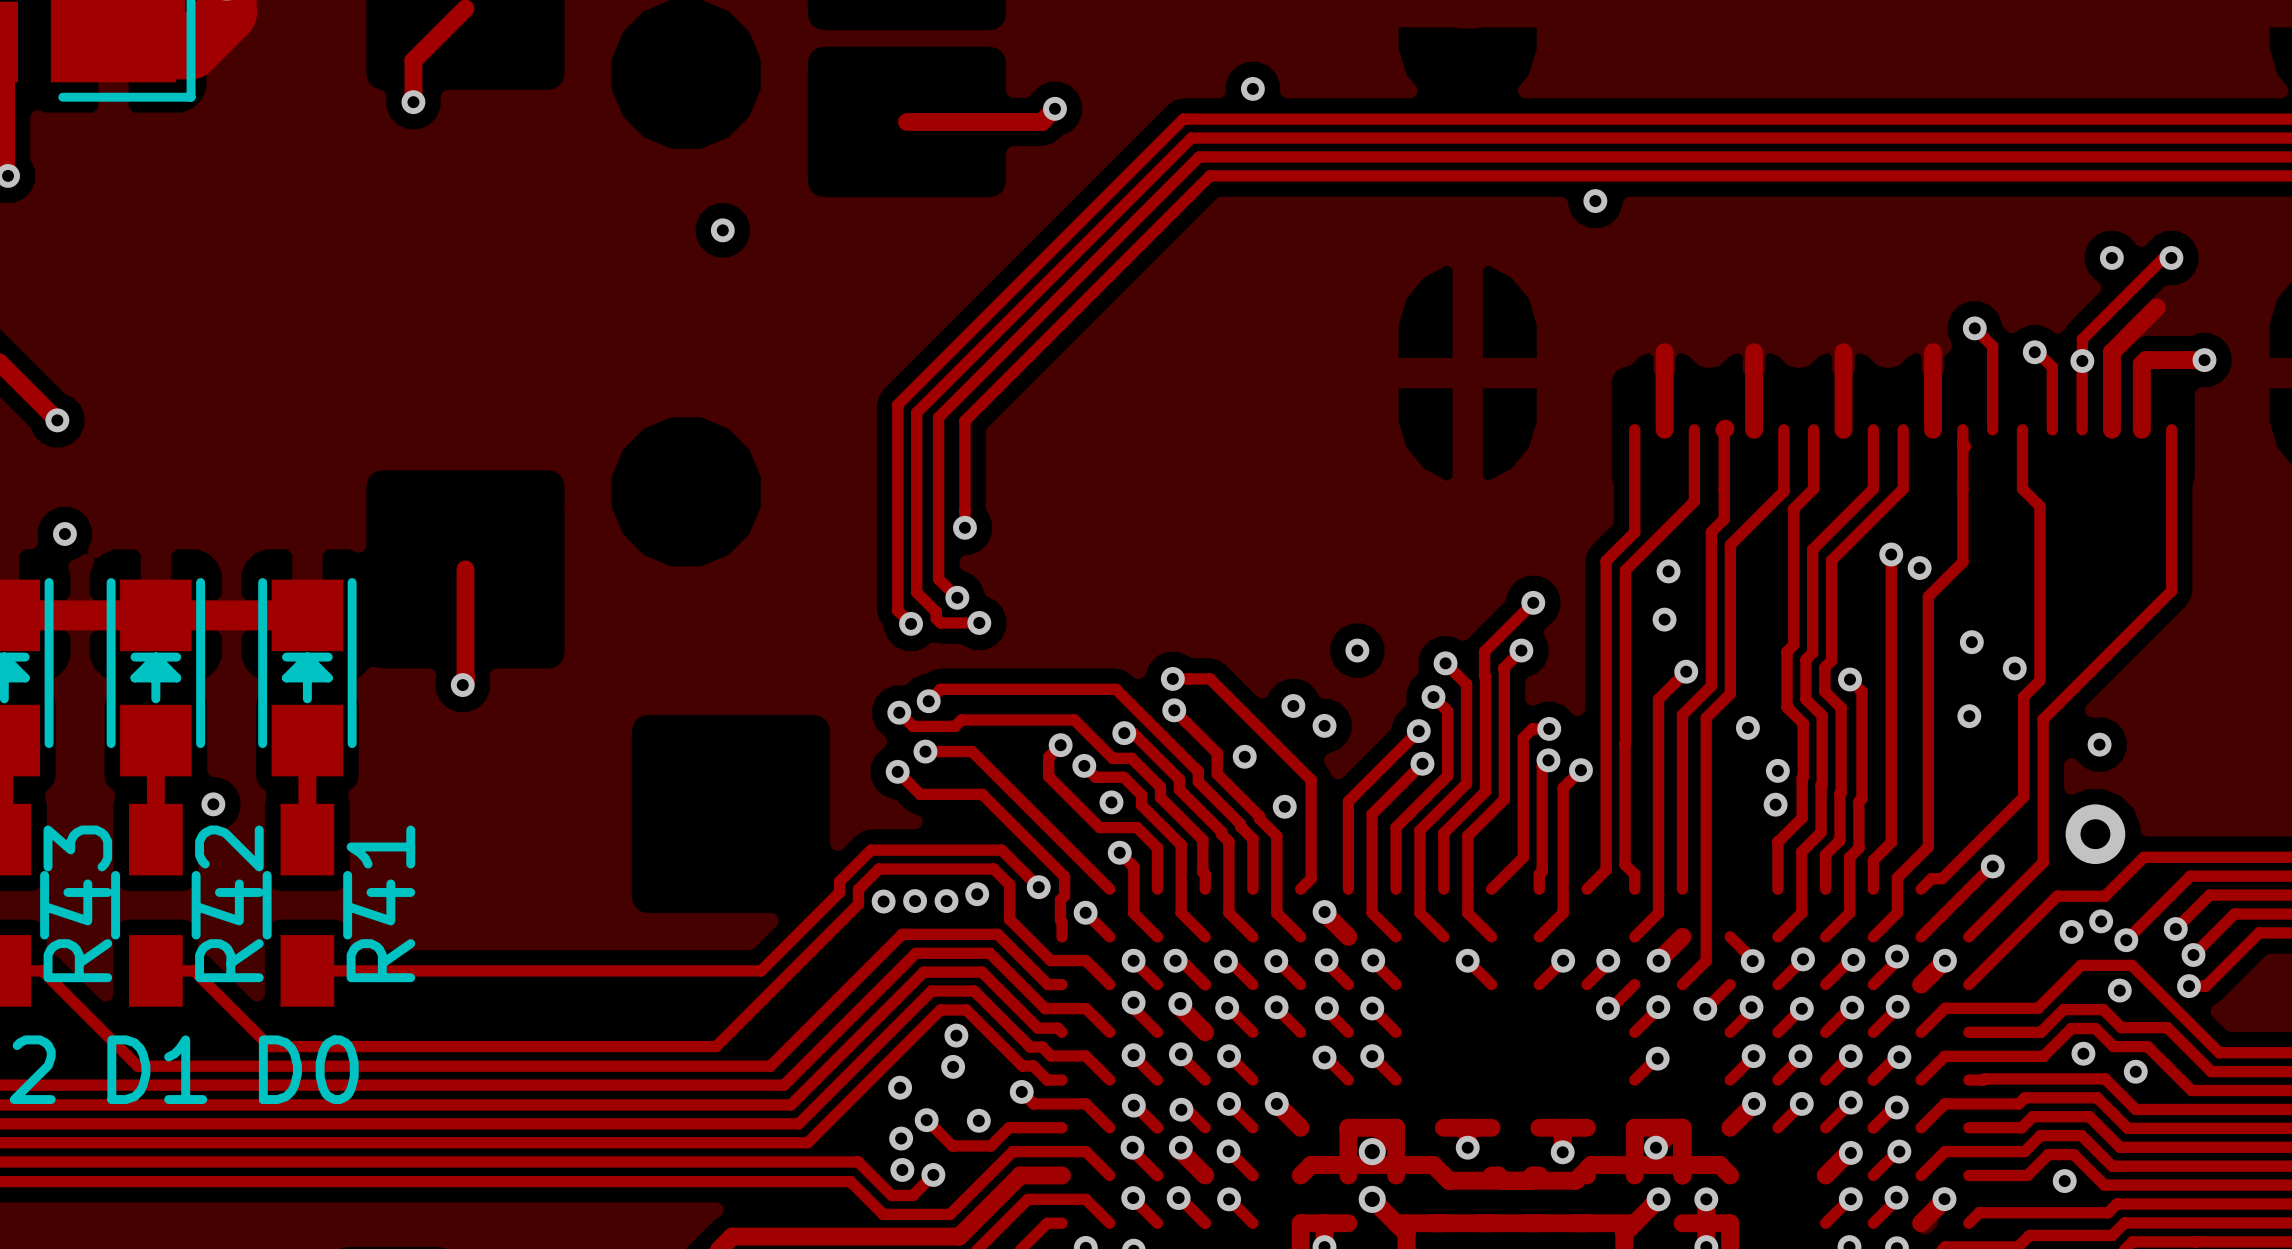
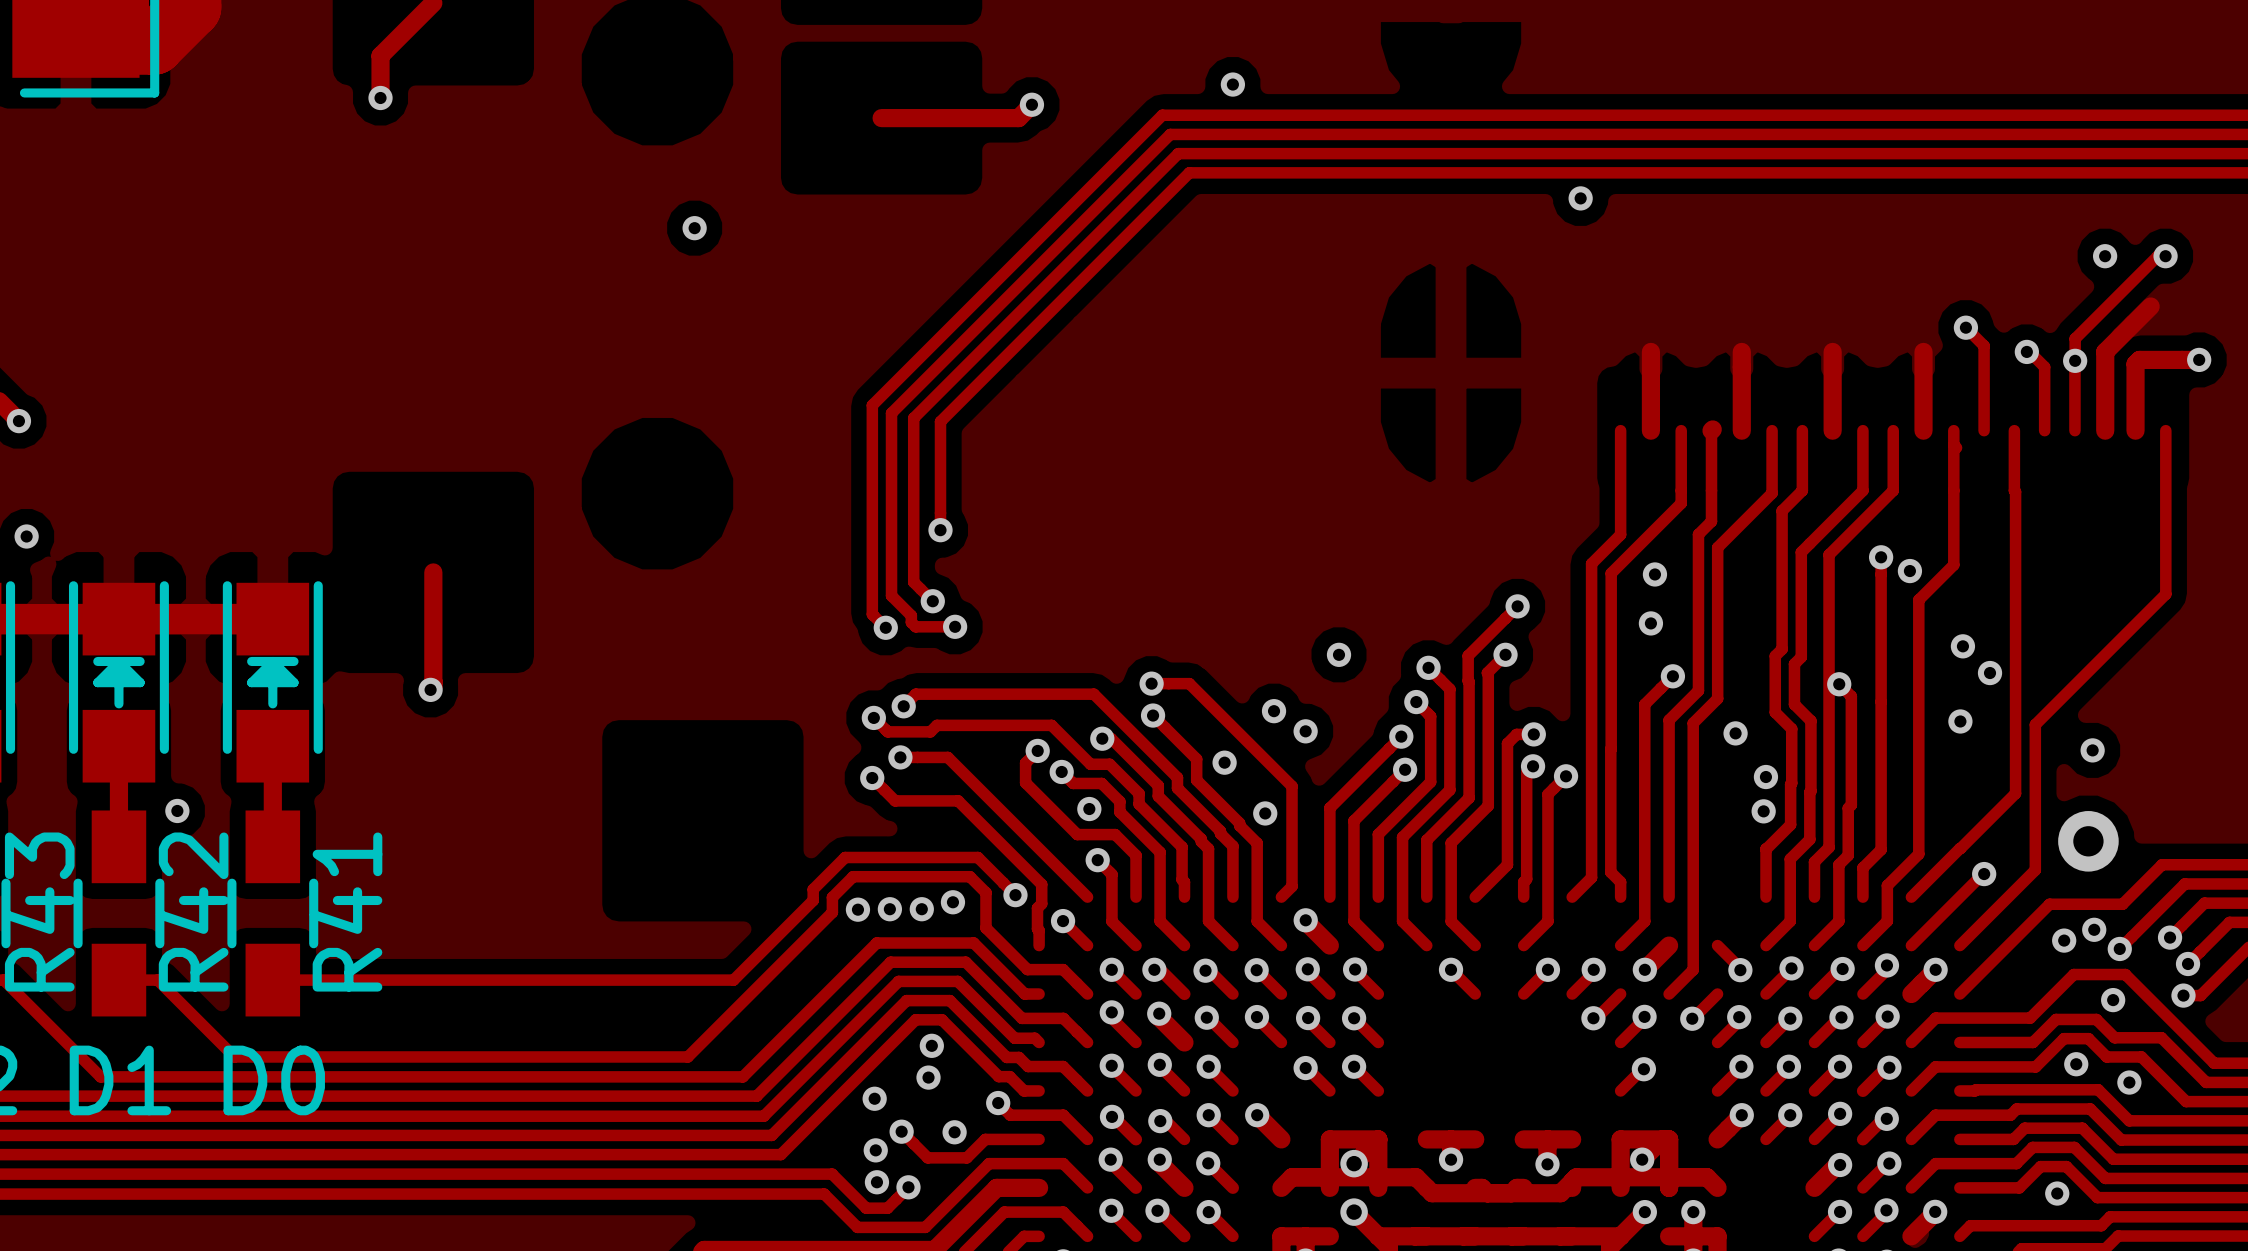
track: (2023, 490) (2039, 506) (2039, 680) (2023, 696) -> (2015, 491) (2015, 701)
track: (1839, 552) (1831, 560) (1831, 660) (1824, 667) (1824, 691) (1841, 707) (1839, 793) -> (1829, 554) (1829, 800)
via position: (2014, 668) -> (1990, 673)
track: (2023, 787) (2023, 797) (1942, 878) (1931, 878) -> (2015, 793) (1960, 848)
track: none -> (1960, 848) (1922, 886)
track: (2167, 857) (2143, 857) (2105, 896) -> (2162, 864) (2122, 904) (2098, 904)

